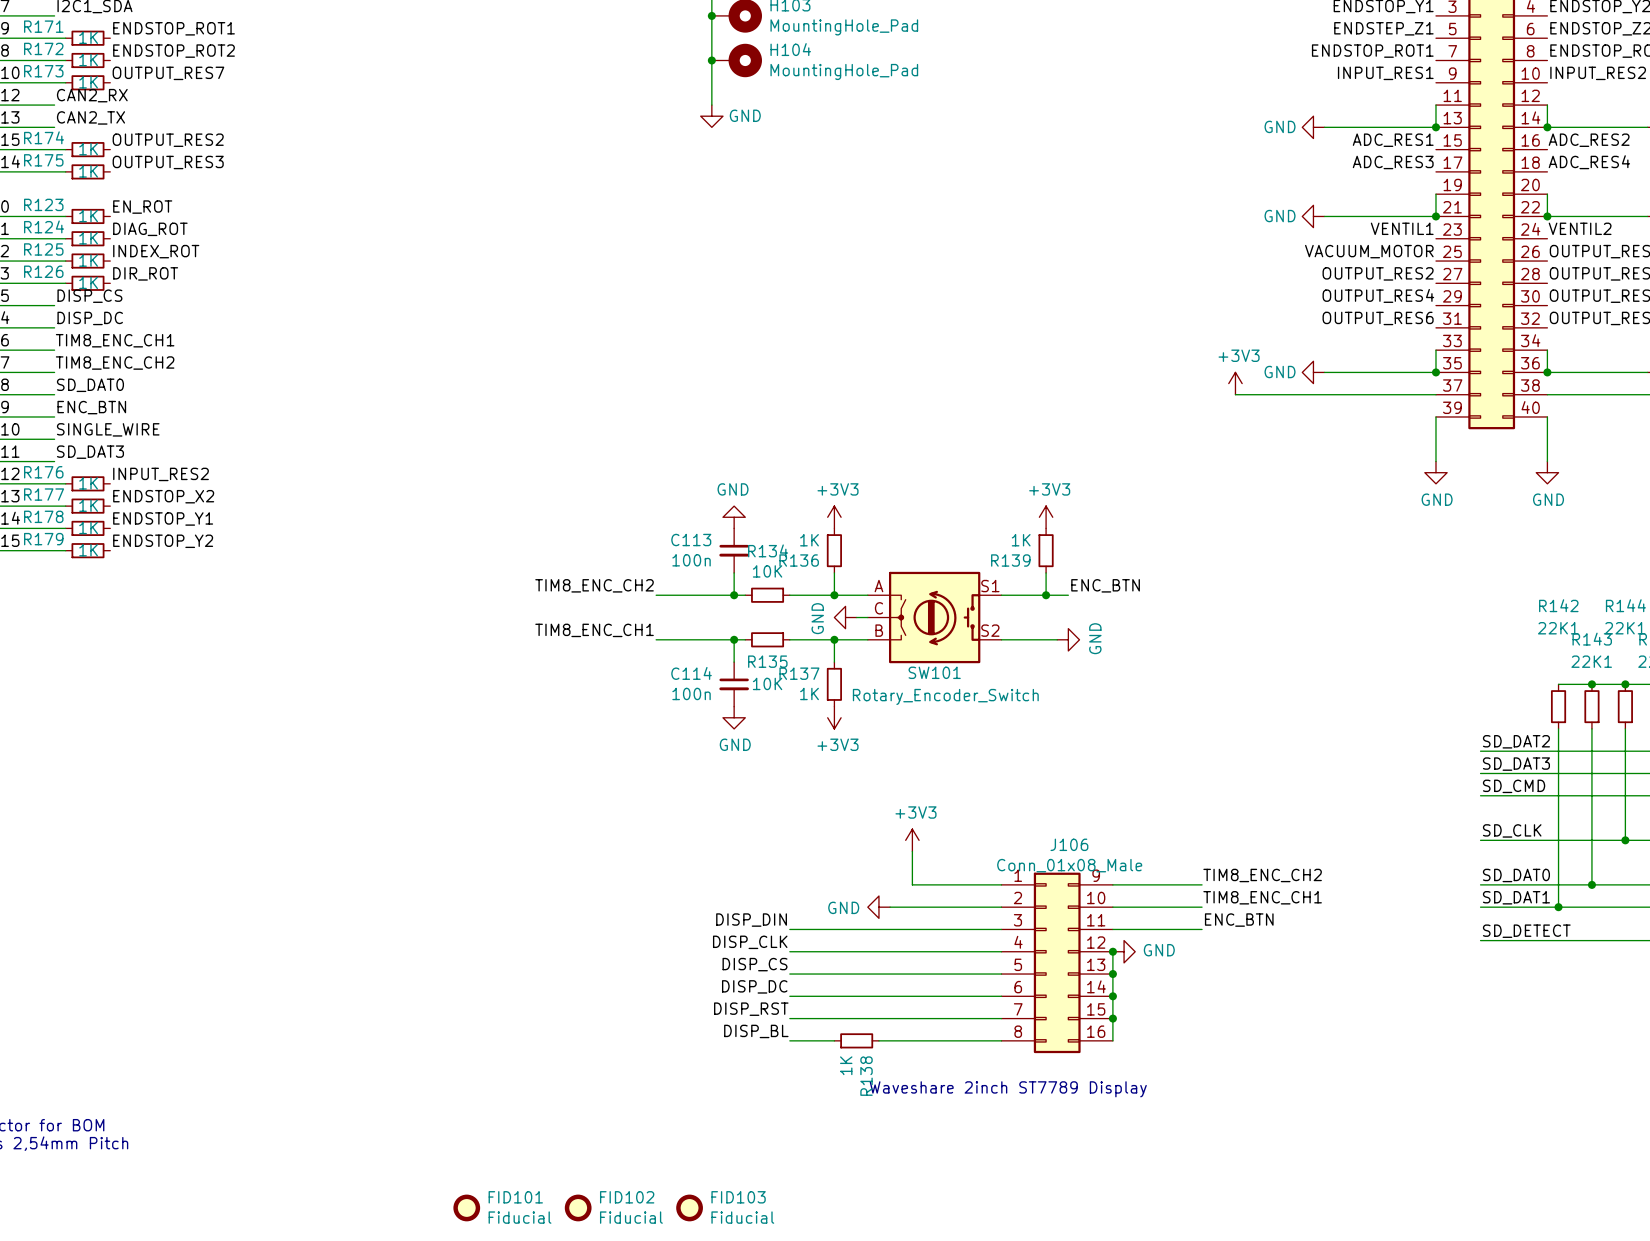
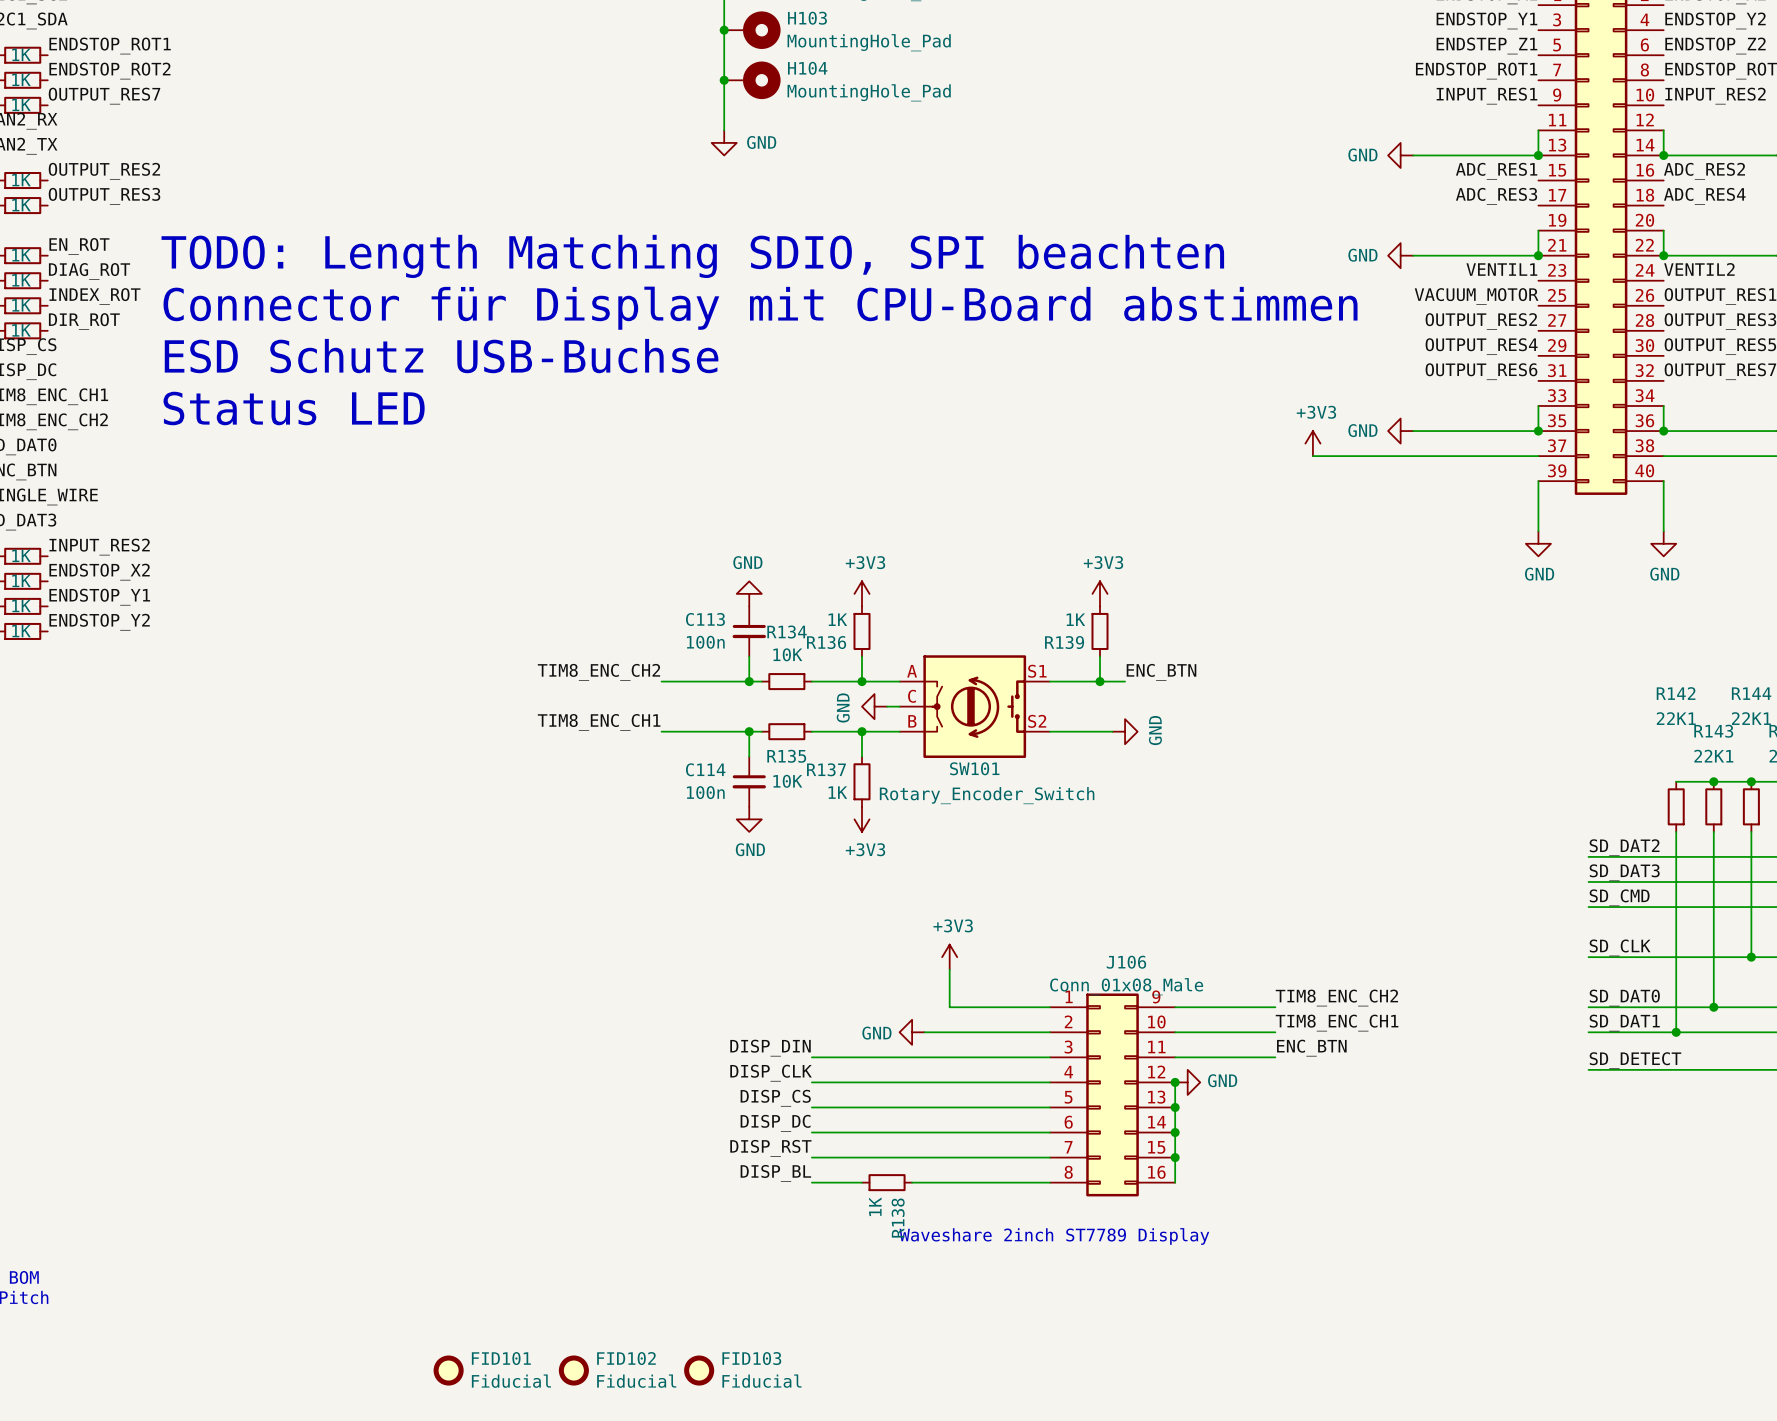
text: none -> TODO: Length Matching SDIO, SPI beachten (692, 256)
text: none -> Connector für Display mit CPU-Board abstimmen (760, 308)
text: none -> ESD Schutz USB-Buchse (441, 356)
text: none -> Status LED (294, 408)

